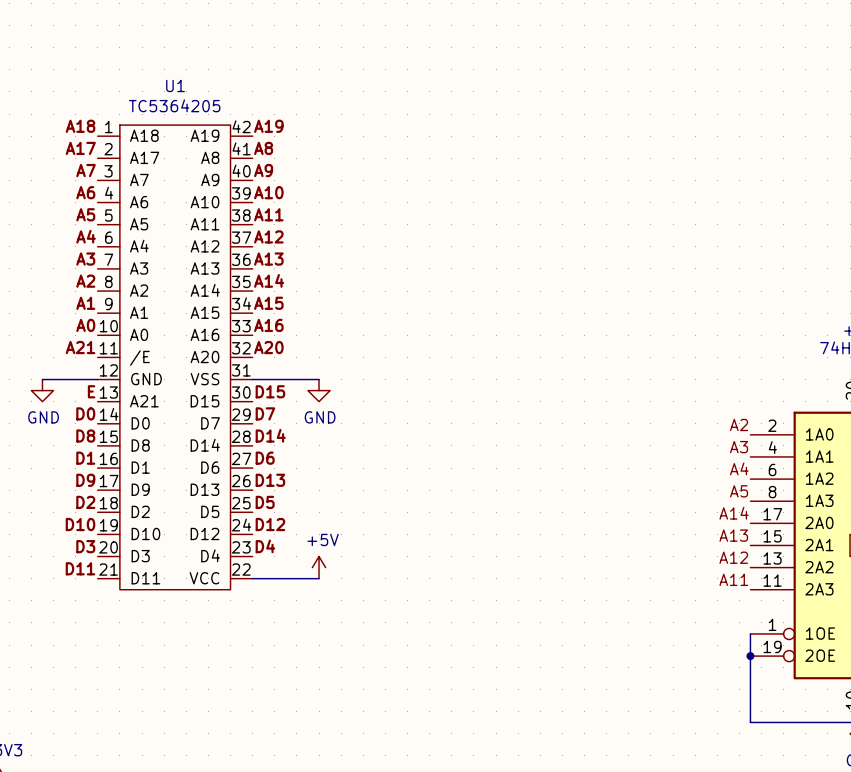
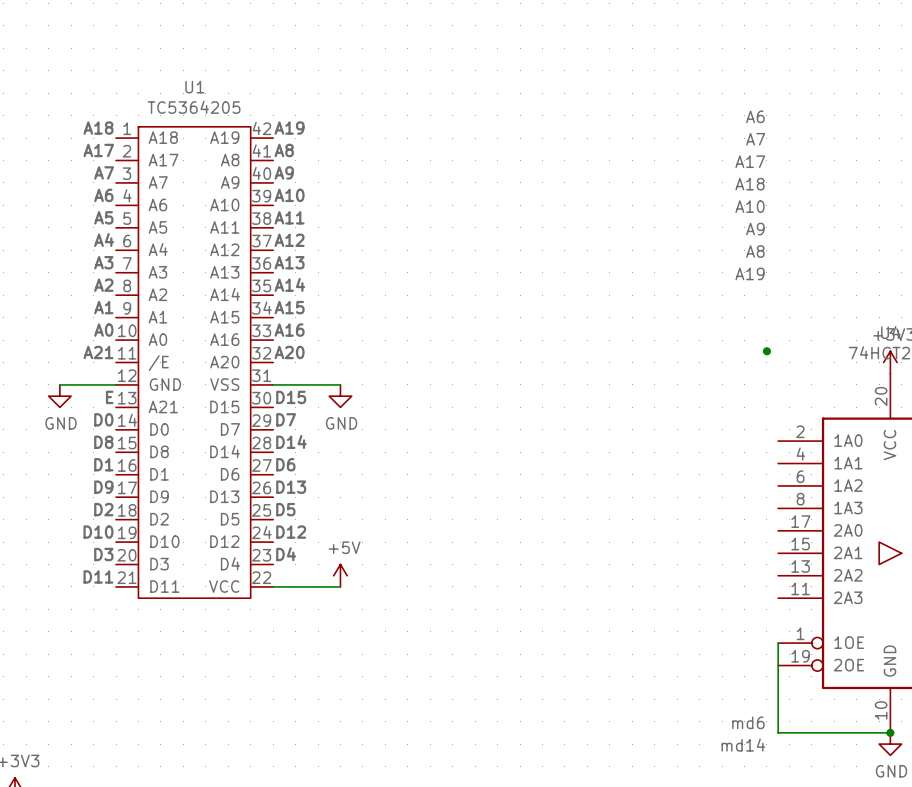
label: none -> A6 (755, 116)
label: none -> A7 (755, 139)
label: none -> A17 (750, 161)
label: none -> A18 (750, 184)
label: none -> A10 (750, 206)
label: none -> A9 (755, 229)
label: none -> A8 (755, 251)
label: none -> A19 (750, 273)
junction: none -> (766, 351)
label: A2 (739, 424) -> none
label: A3 (739, 447) -> none
label: A4 (739, 468) -> none
label: A5 (739, 491) -> none
label: A14 (734, 513) -> none
label: A13 (733, 535) -> none
label: A12 (733, 557) -> none
label: A11 (733, 579) -> none
junction: (750, 656) -> none
label: none -> md6 (748, 722)
label: none -> md14 (743, 745)

